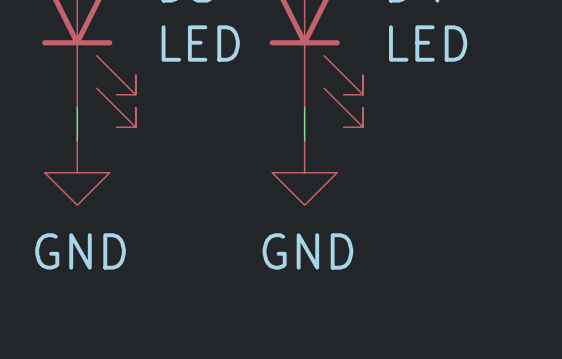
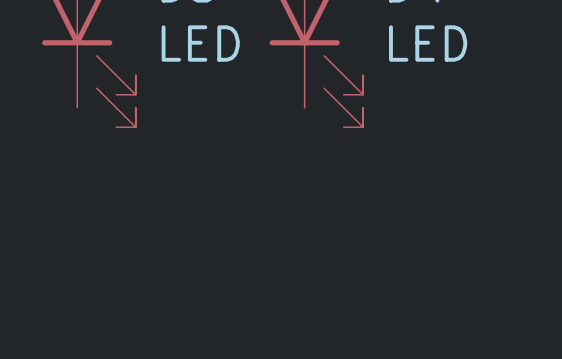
wire: (77, 107) (77, 140) -> none
wire: (304, 107) (304, 140) -> none
power symbol: GND (77, 172) -> none
power symbol: GND (304, 172) -> none

